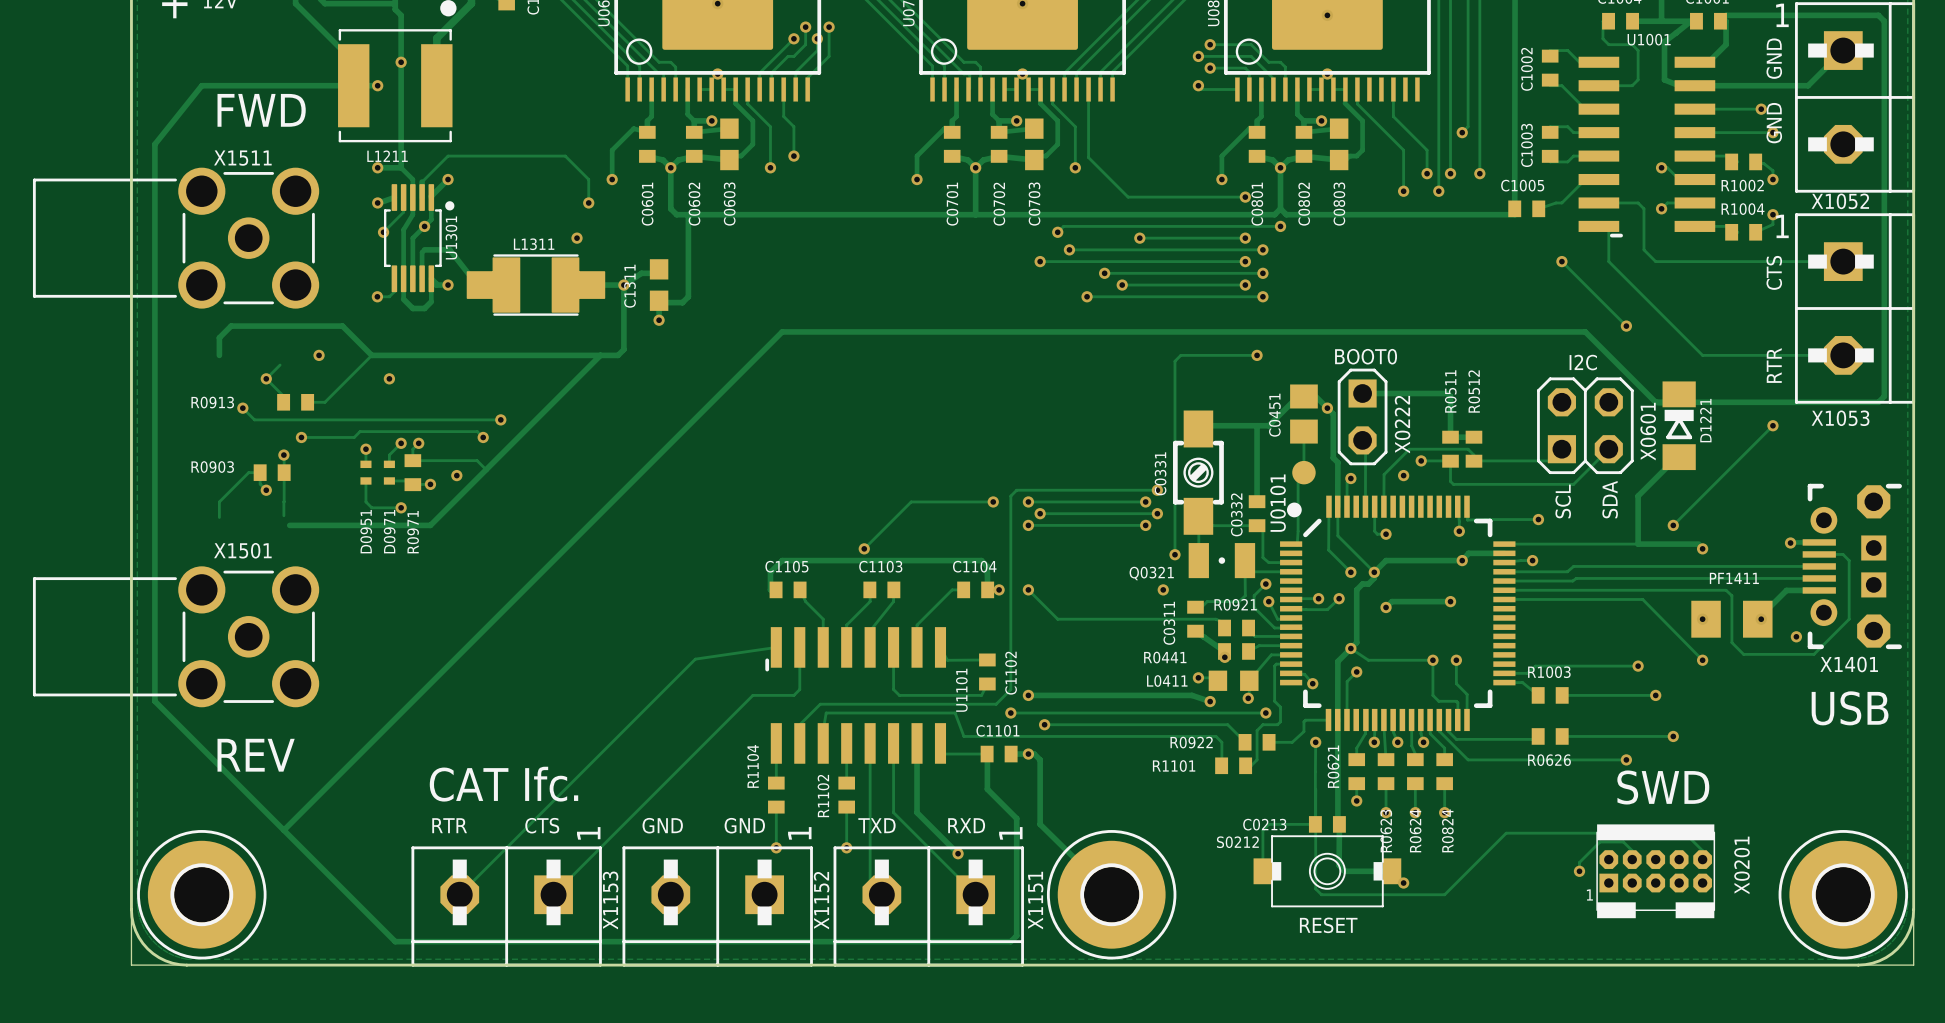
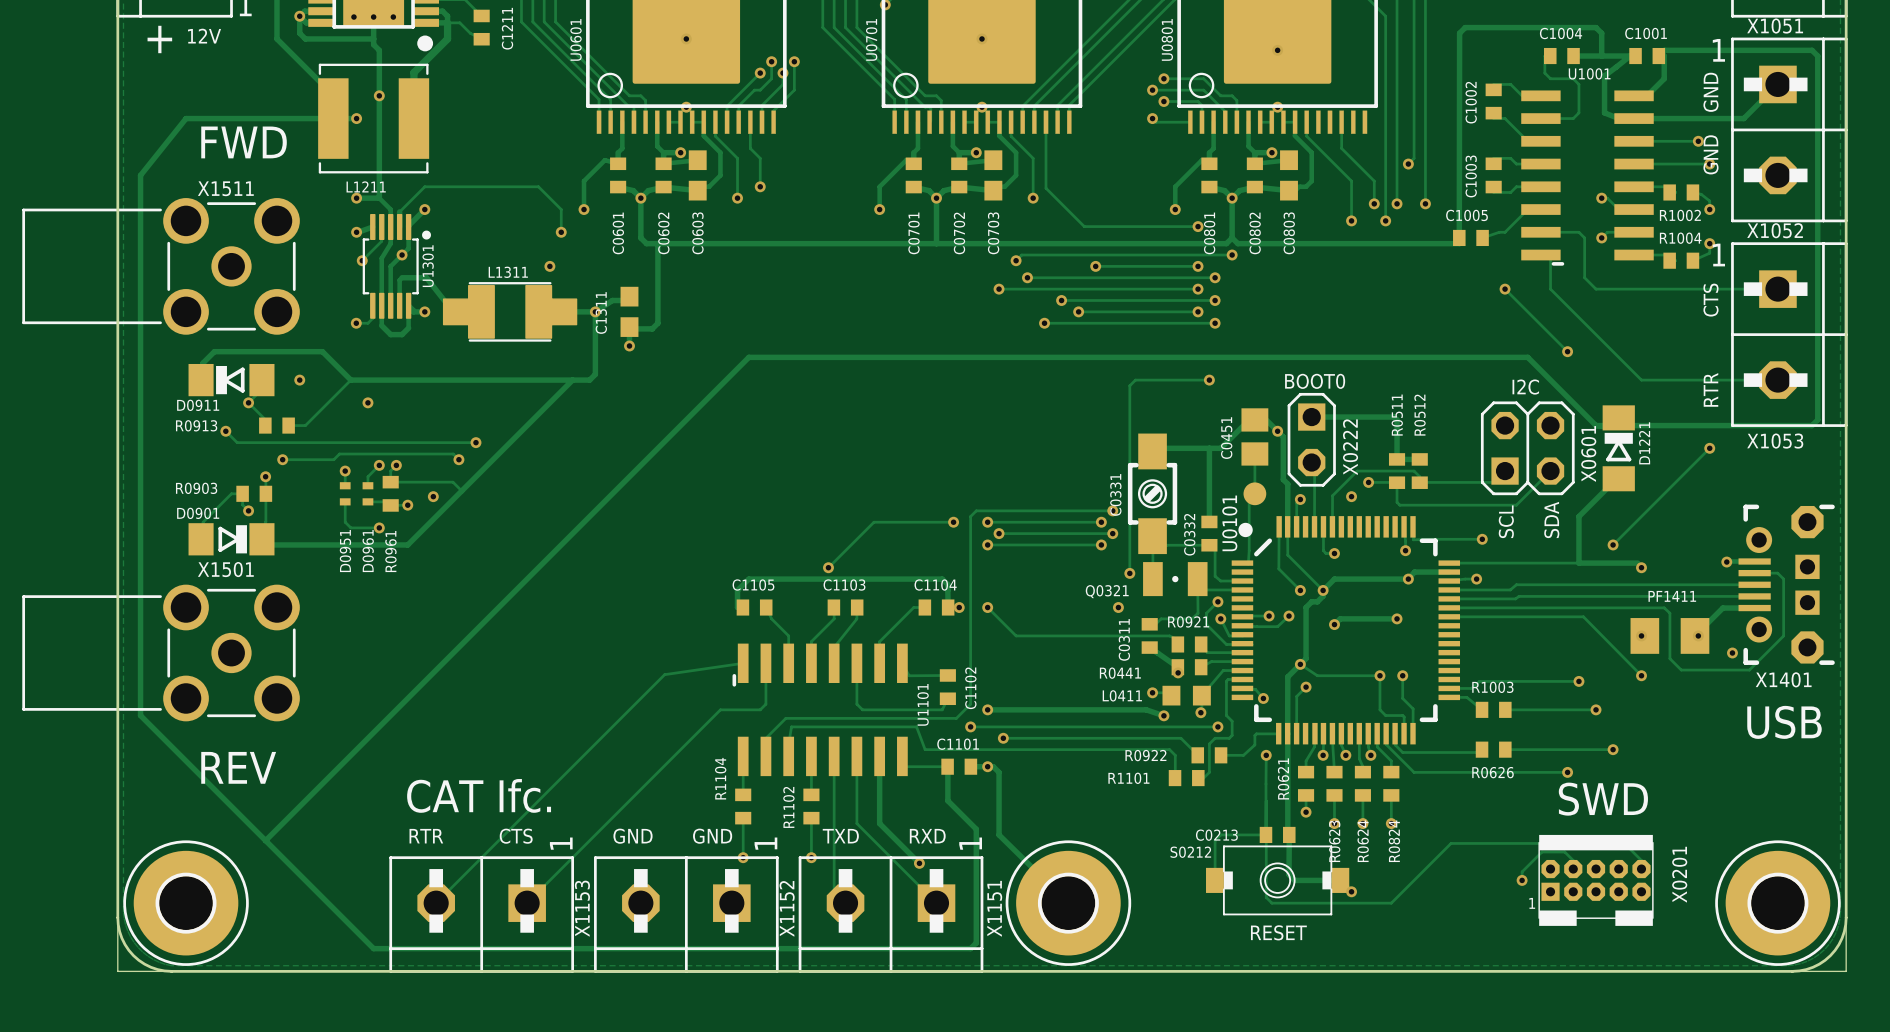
D0911: none -> (231, 380)
D0901: none -> (231, 539)
D0971 name: D0971 (389, 531) -> D0961 (368, 551)
R0971 name: R0971 (413, 532) -> R0961 (390, 551)

